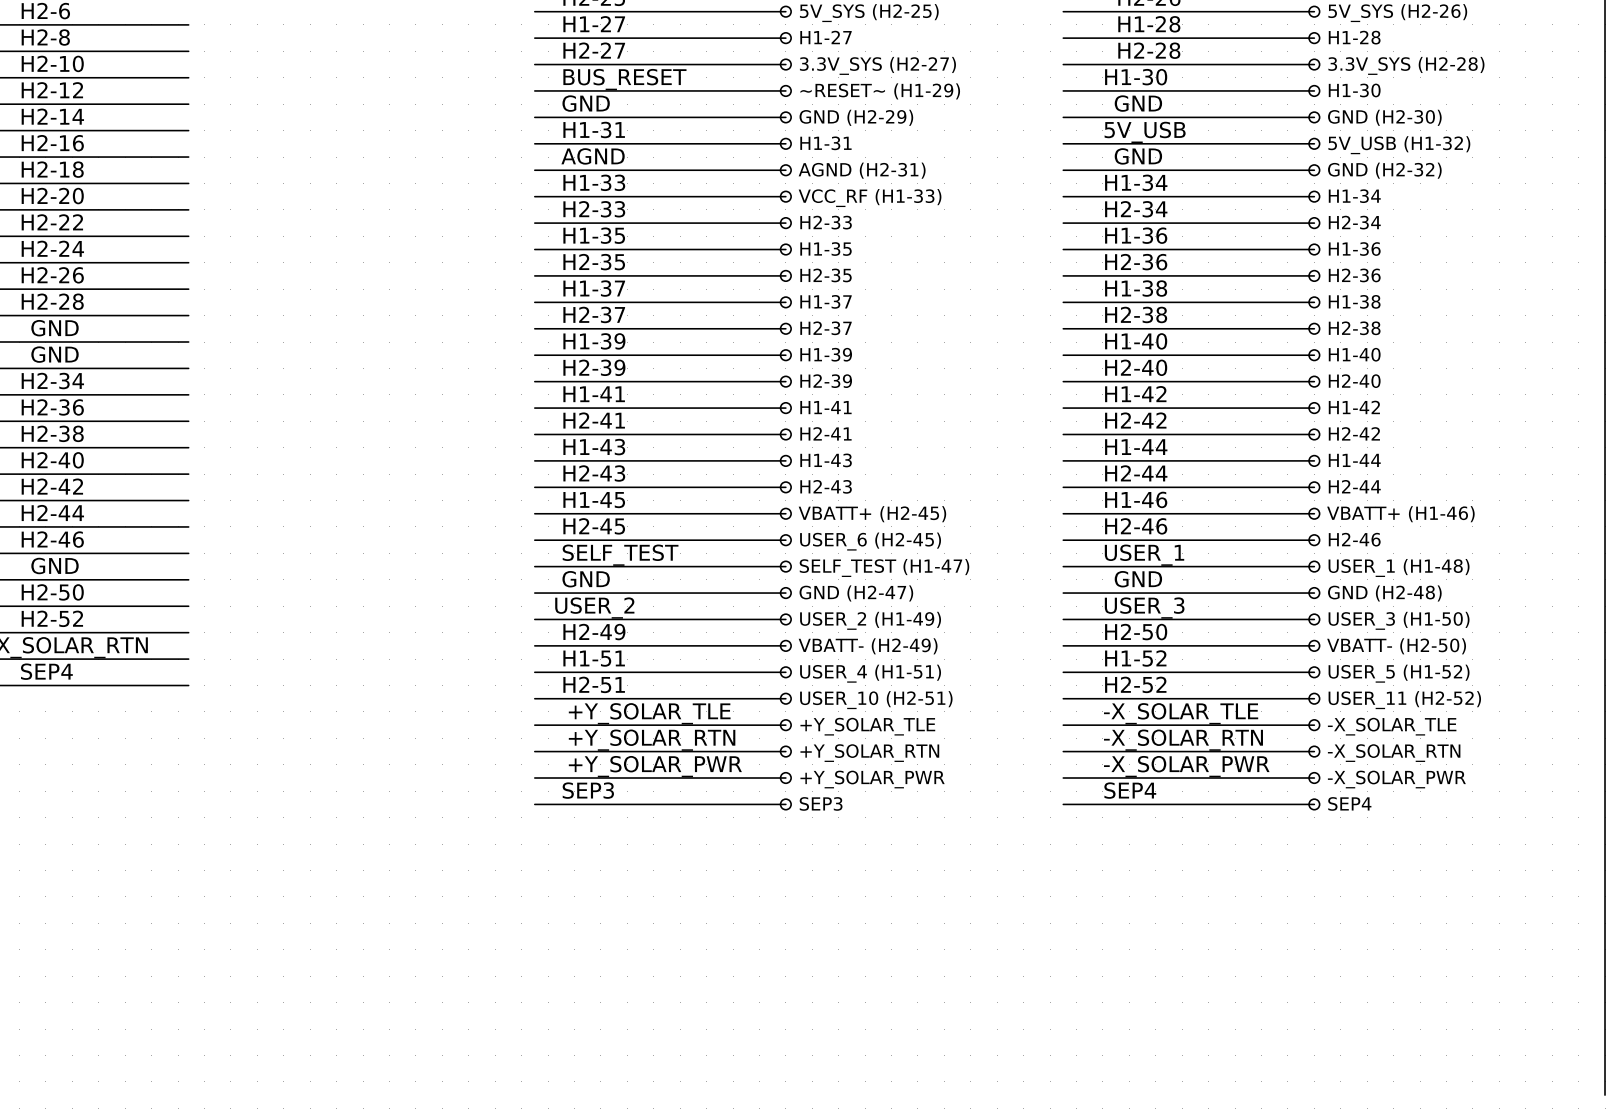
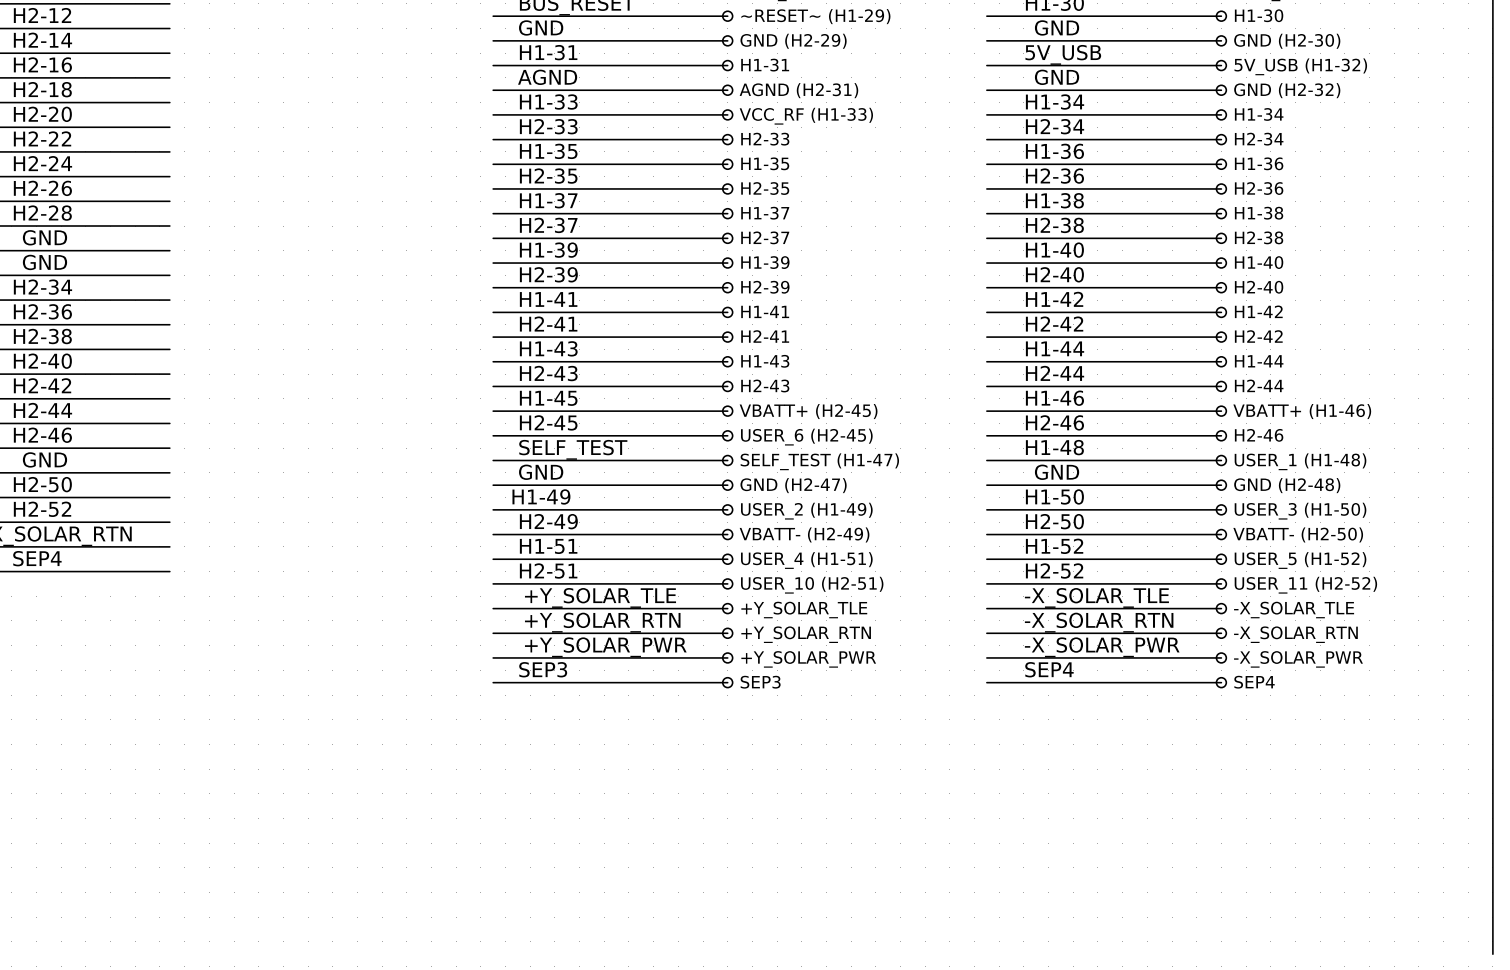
label: USER_1 (1144, 555) -> H1-48 (1054, 447)
label: USER_2 (594, 608) -> H1-49 (541, 496)
label: USER_3 (1144, 608) -> H1-50 (1054, 496)

